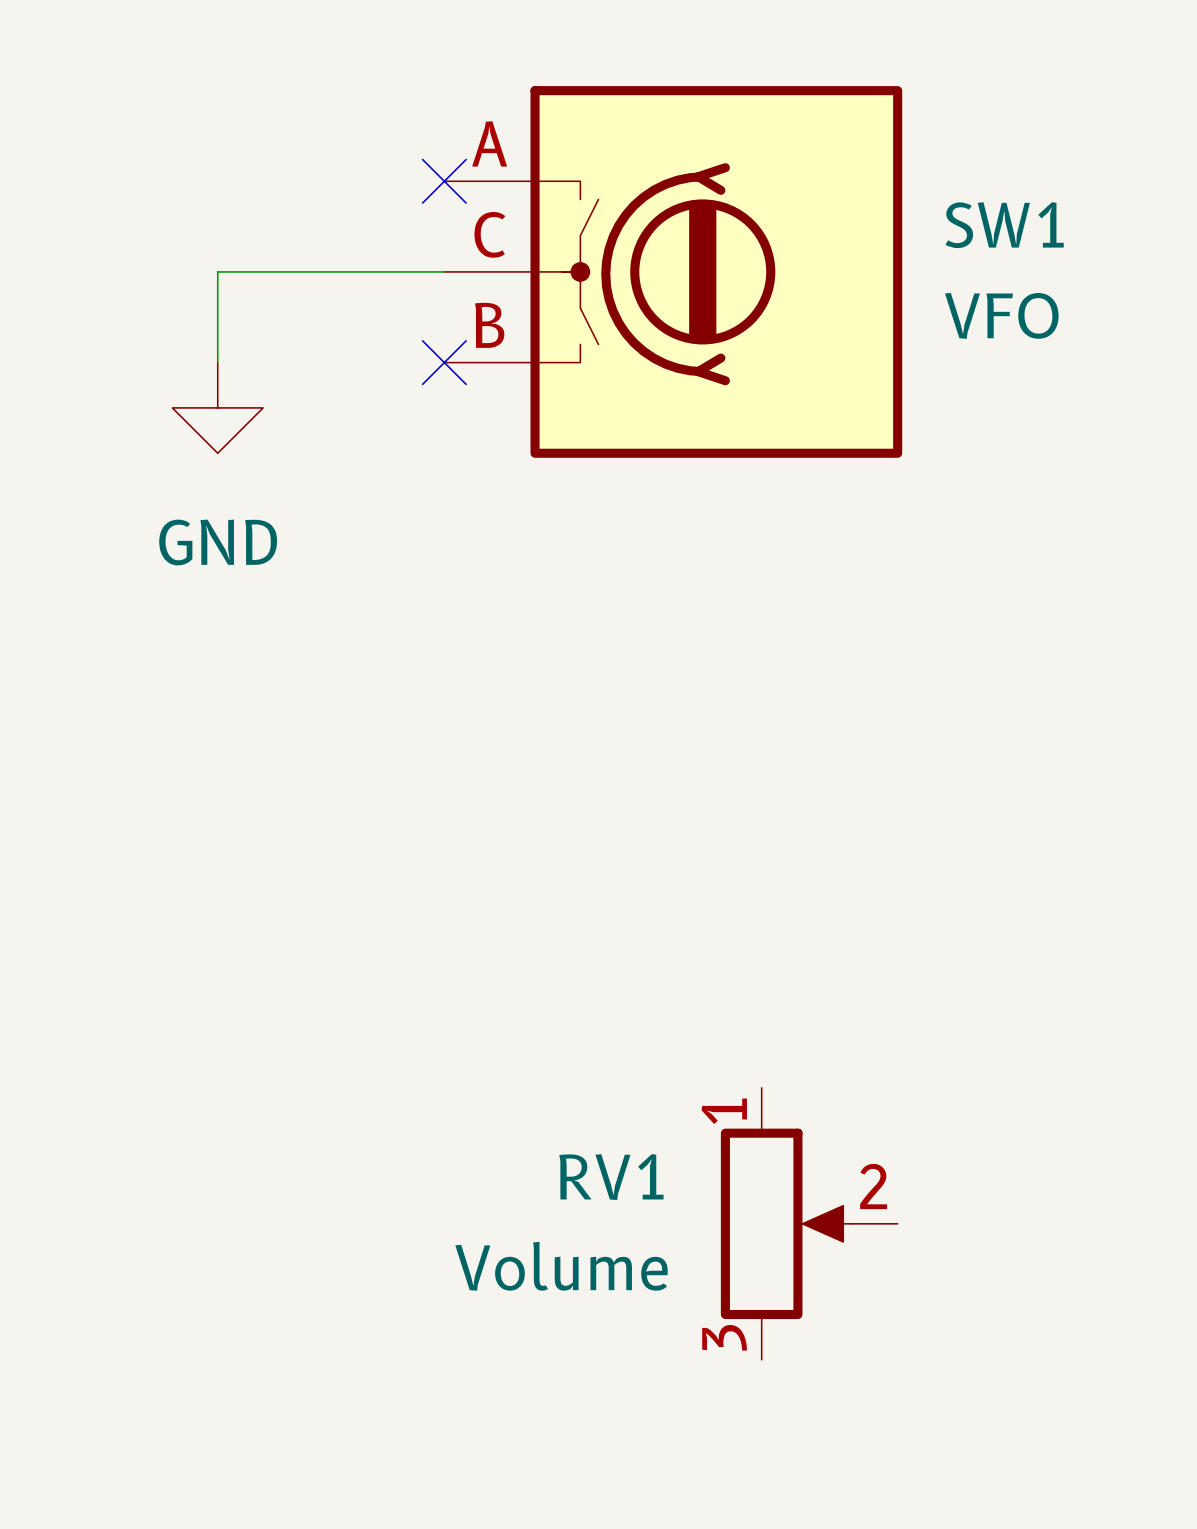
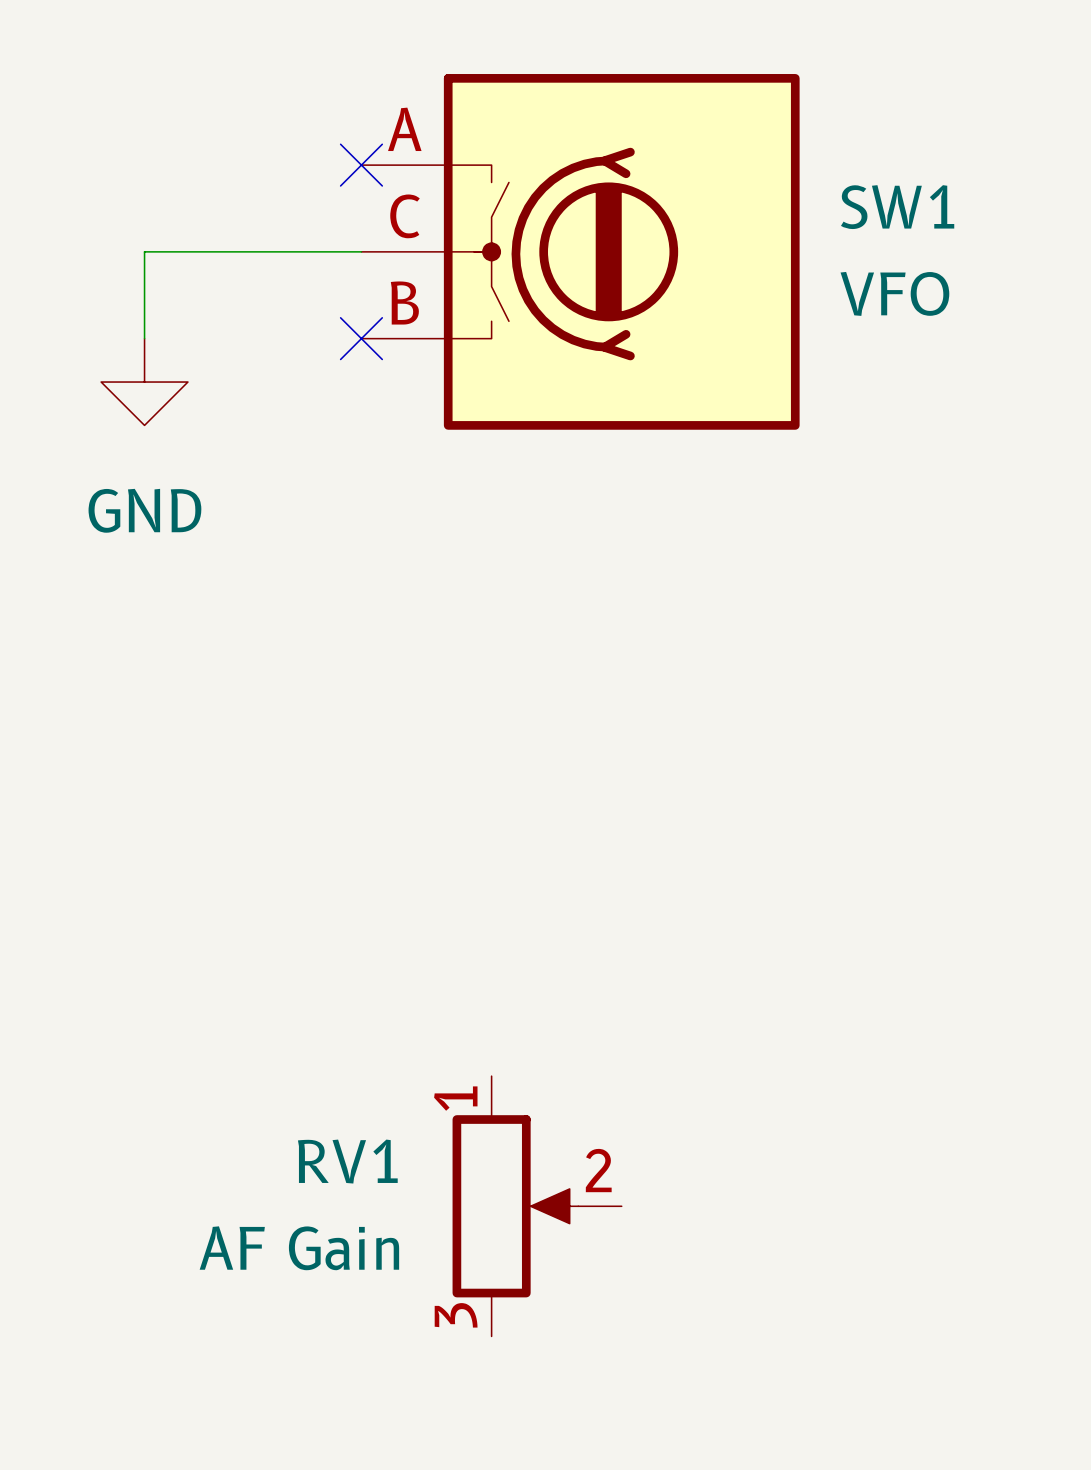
RV1 position: (809, 1223) -> (537, 1206)
RV1 value: Volume (561, 1266) -> AF Gain (299, 1248)

